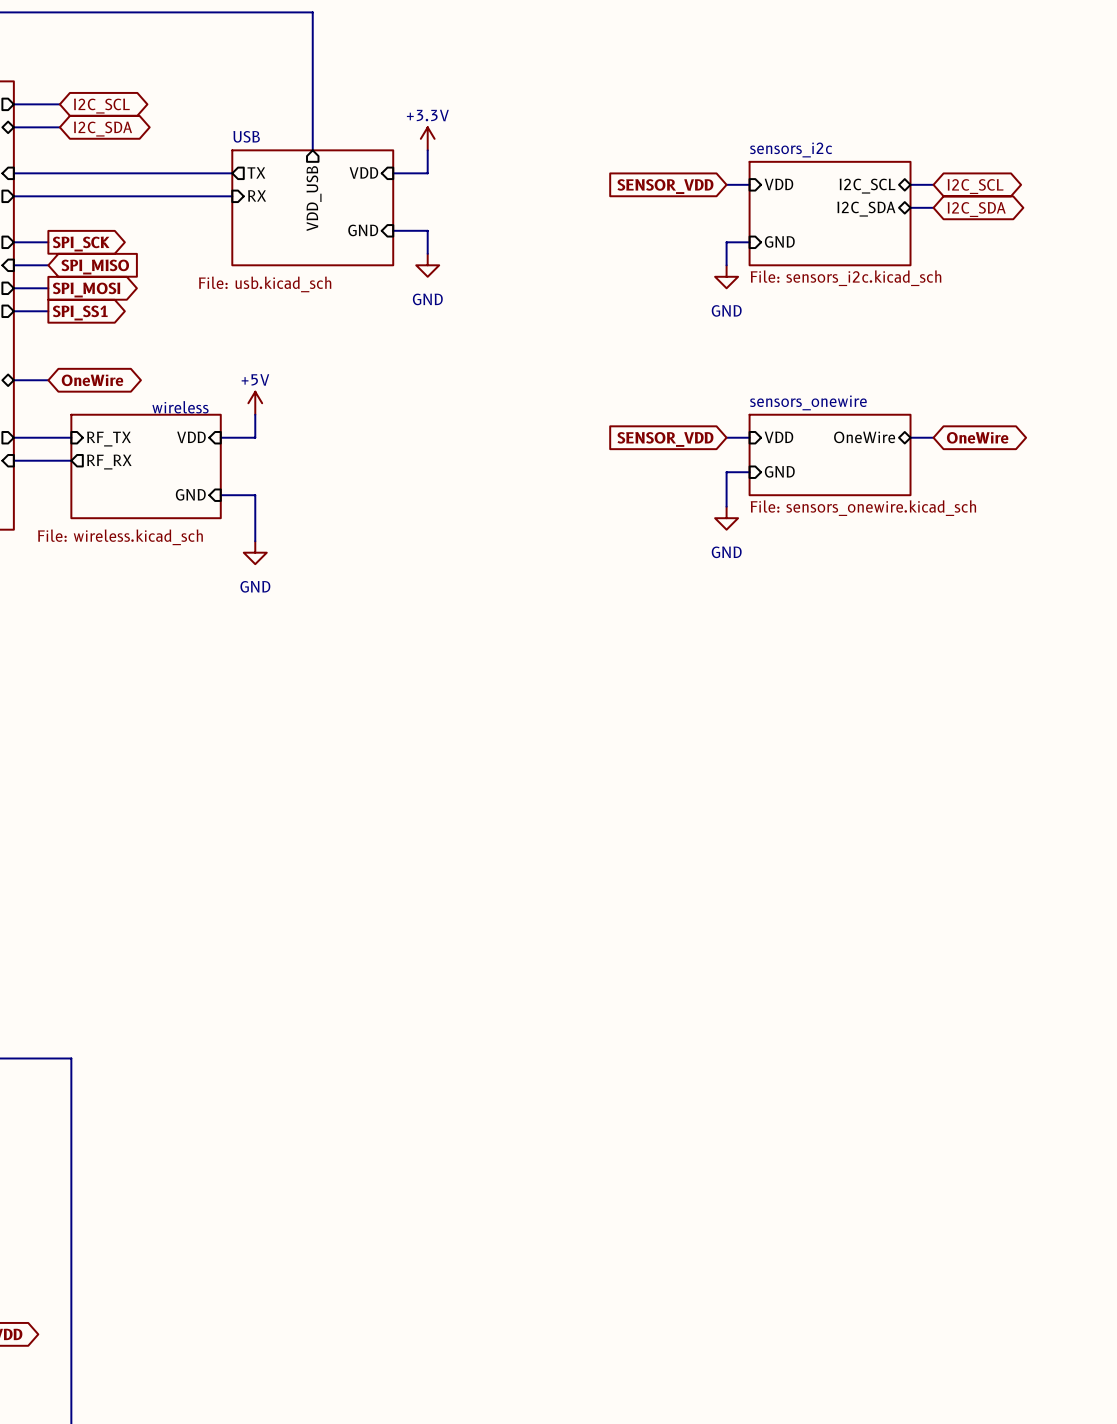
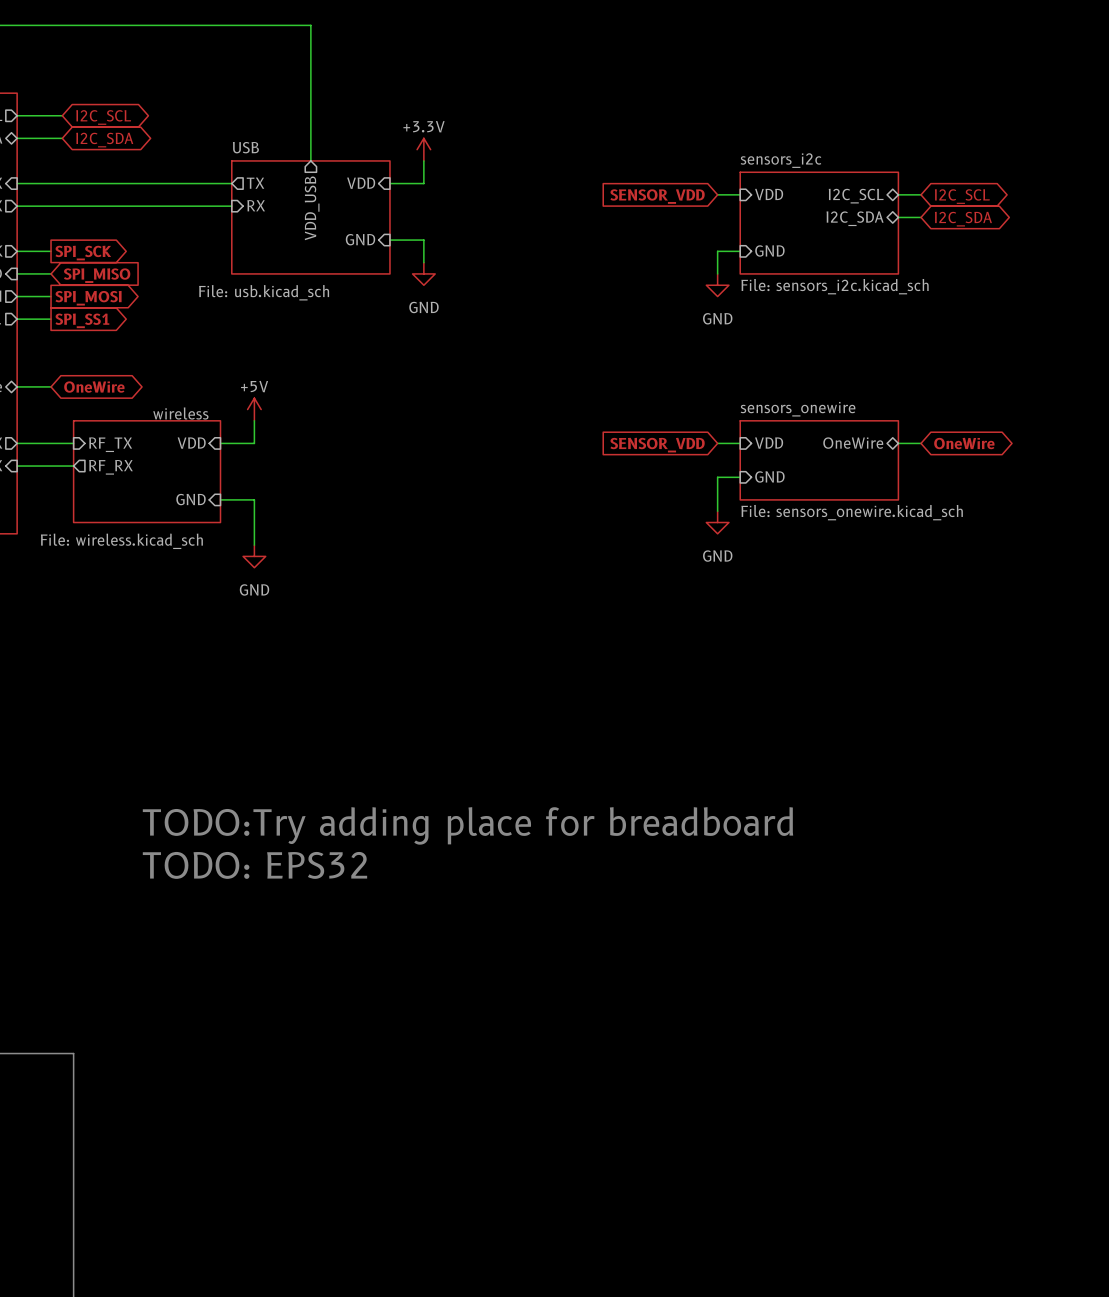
text: none -> TODO:Try adding place for breadboard (468, 825)
text: none -> TODO: EPS32 (254, 865)

